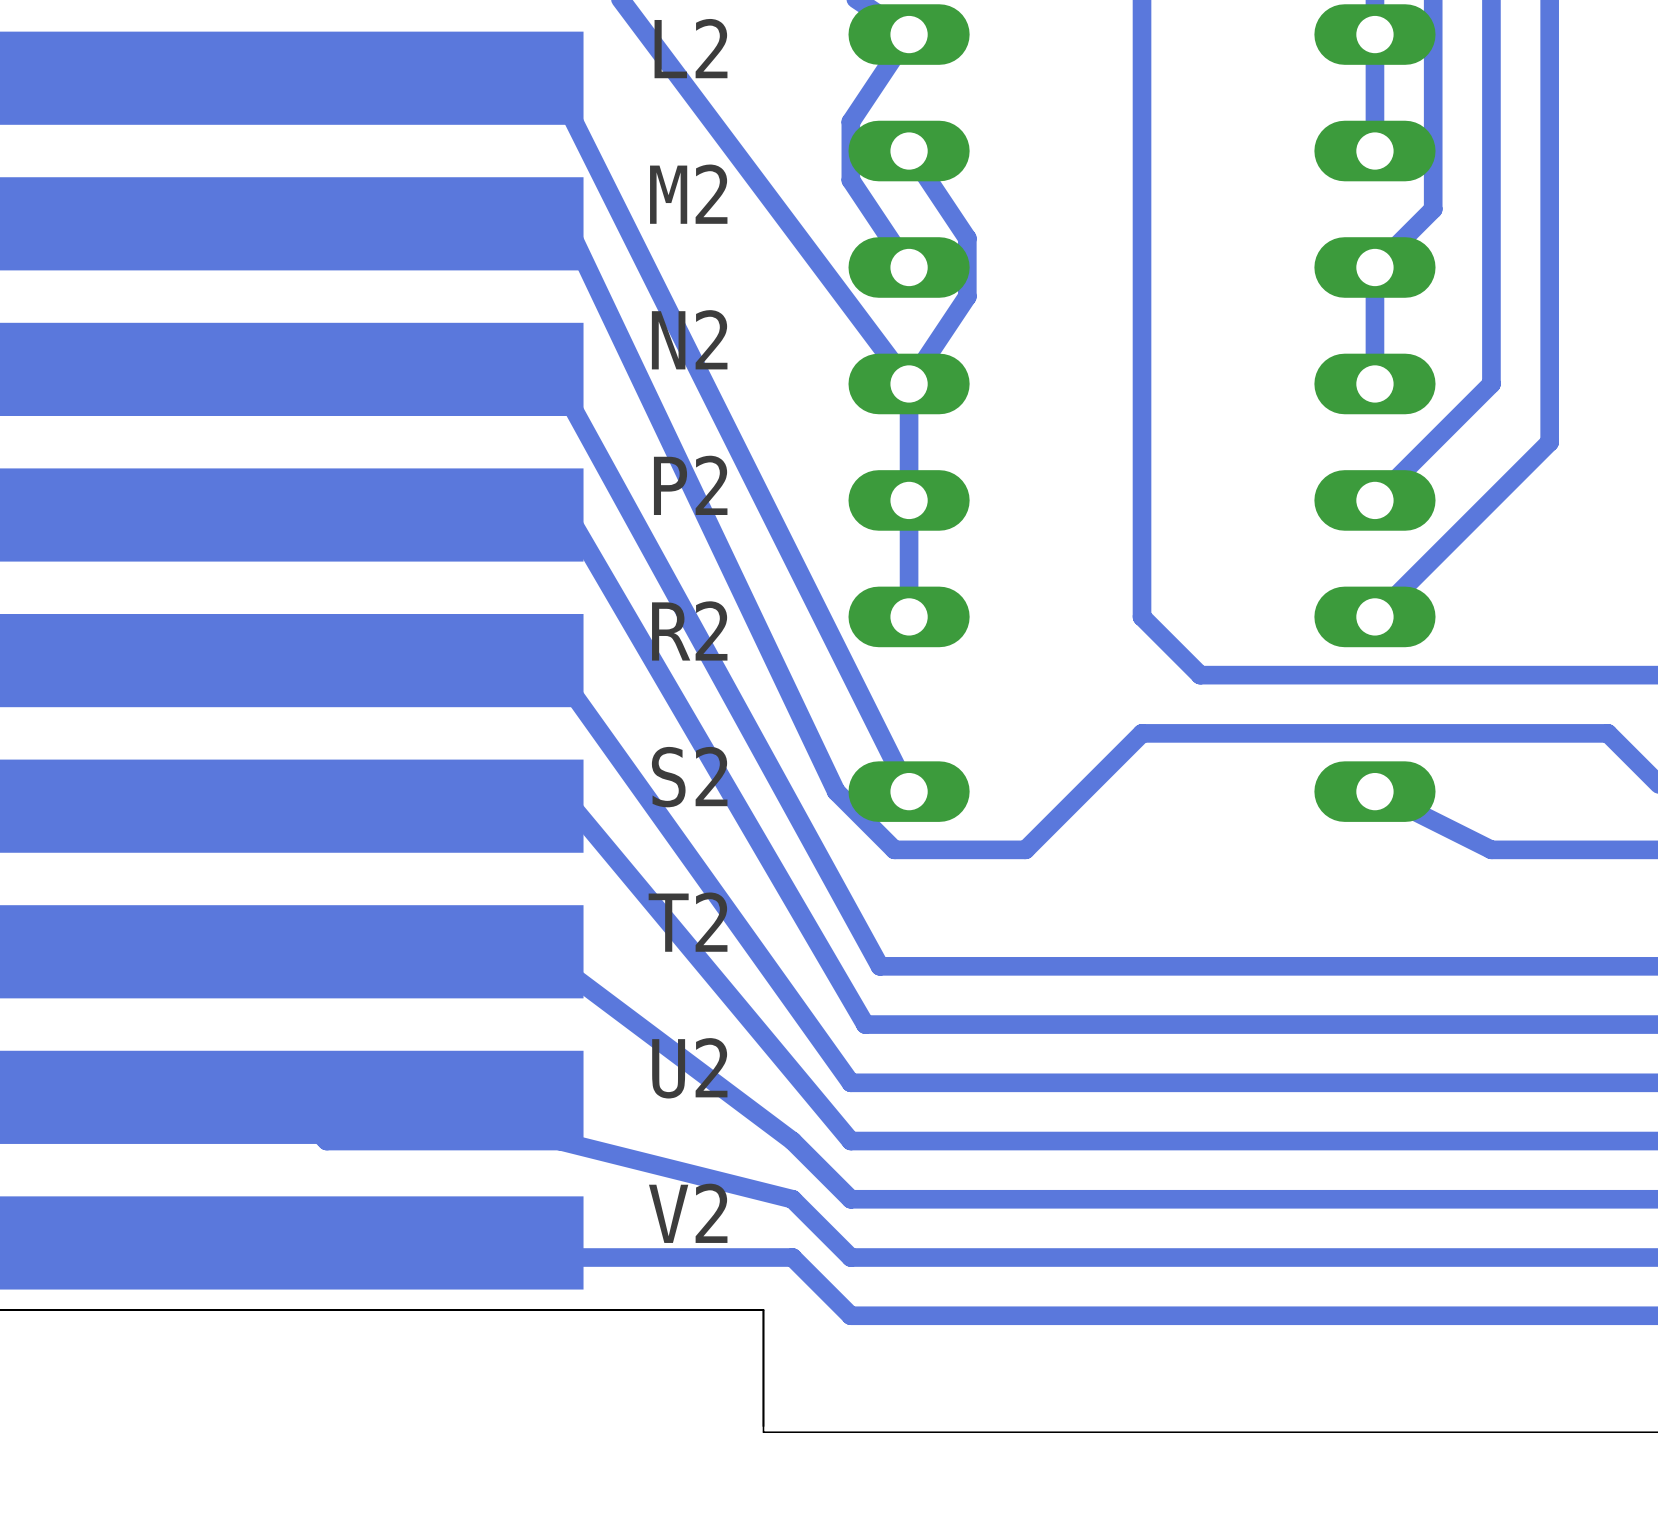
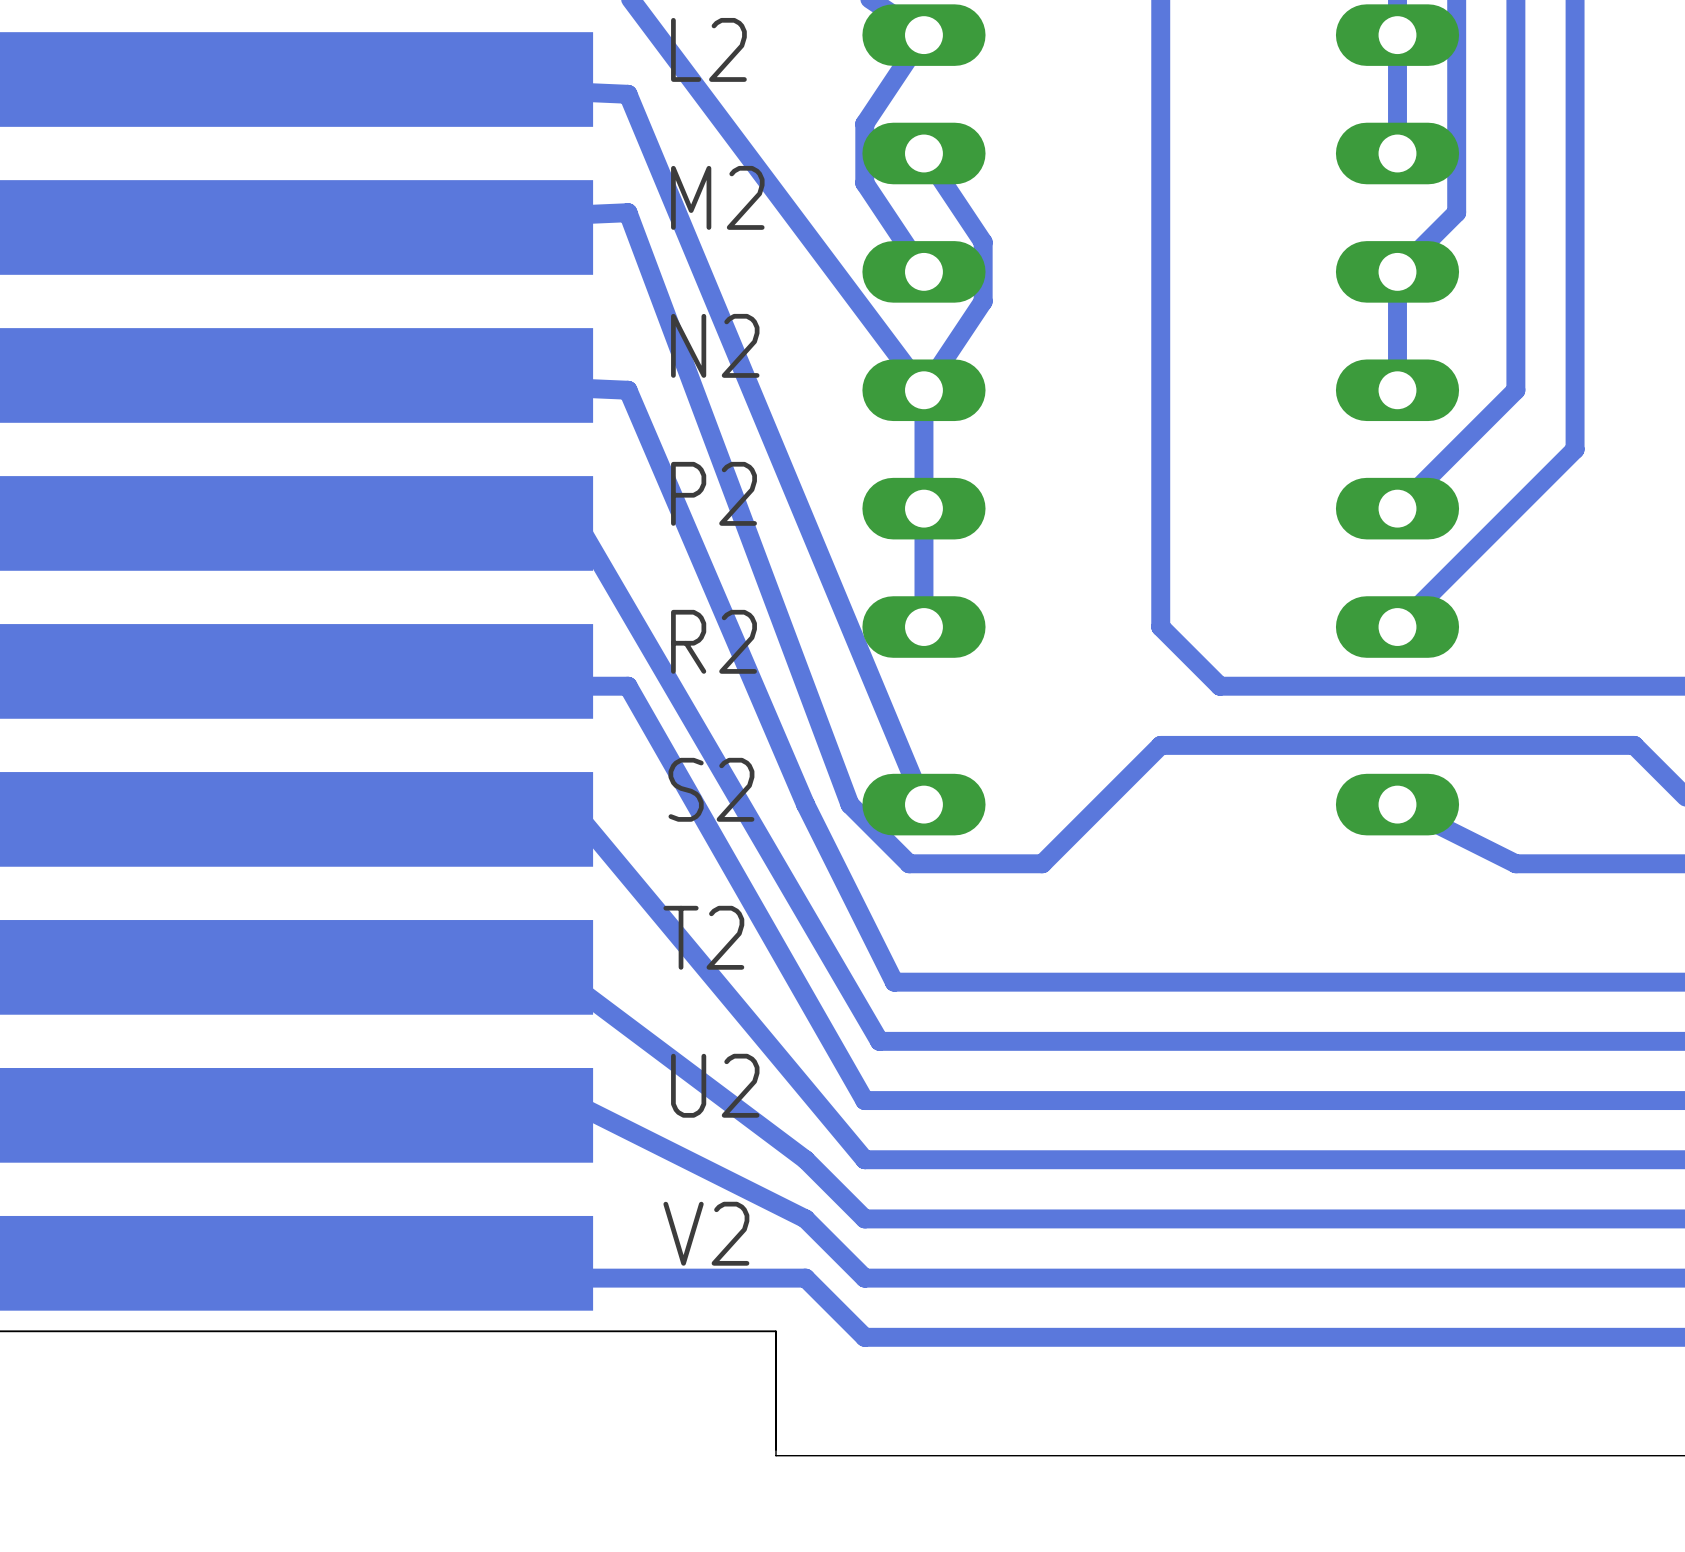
track: (283, 78) (559, 92) (909, 791) -> (287, 79) (628, 94) (923, 804)
track: (283, 223) (559, 209) (836, 791) -> (287, 227) (628, 212) (849, 804)
track: (283, 369) (559, 383) (879, 966) -> (287, 375) (628, 390) (805, 804) (894, 982)
track: (559, 675) (850, 1082) -> (568, 686) (628, 686) (864, 1100)
track: (283, 1097) (326, 1141) (559, 1141) (792, 1199) -> (287, 1115) (332, 1100) (568, 1100) (805, 1218)

